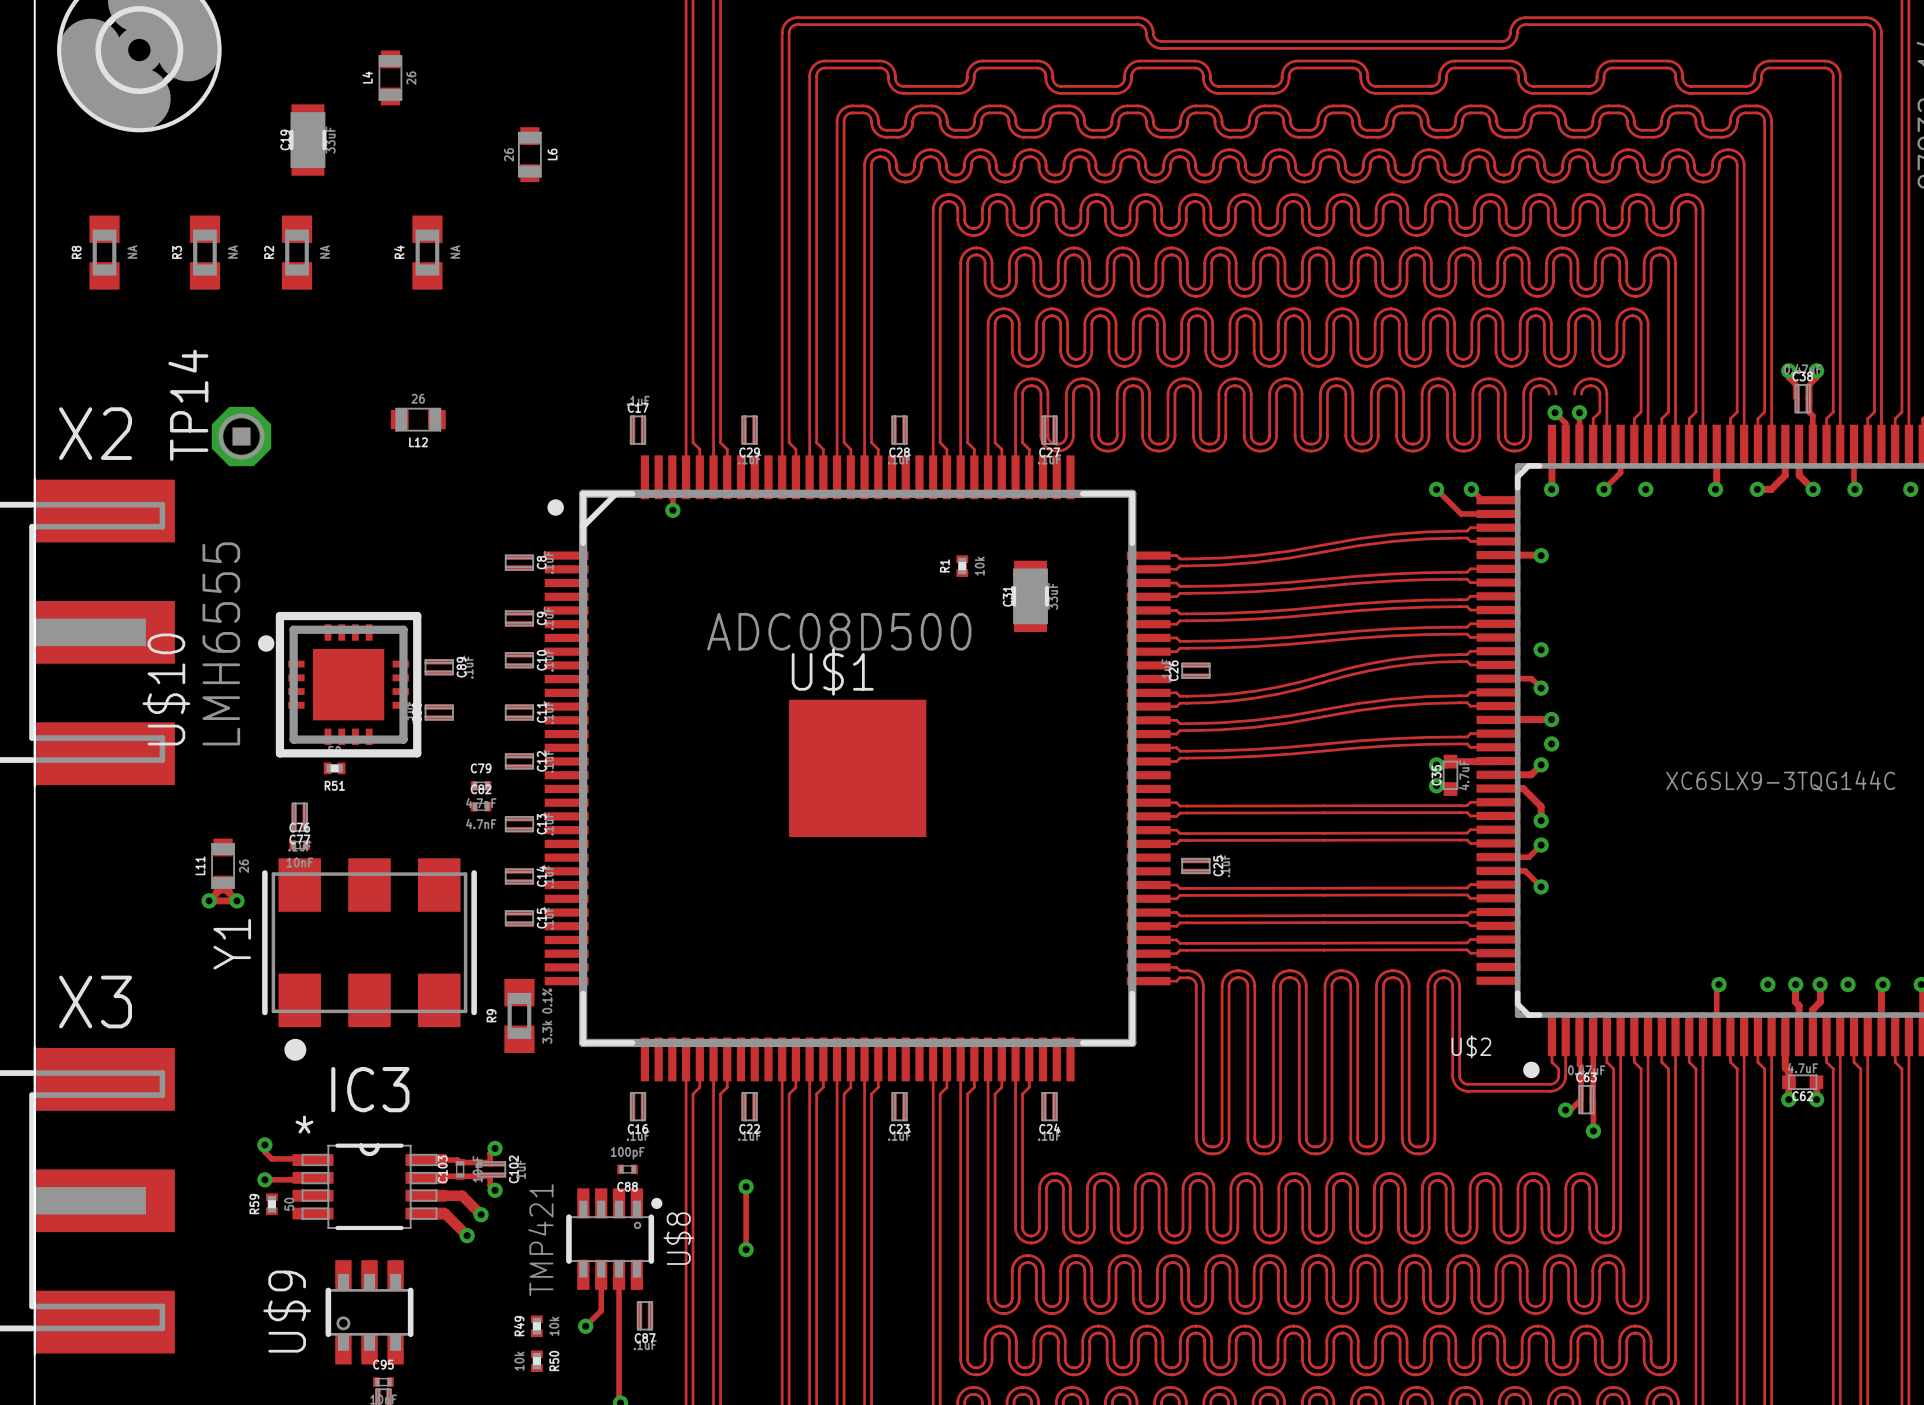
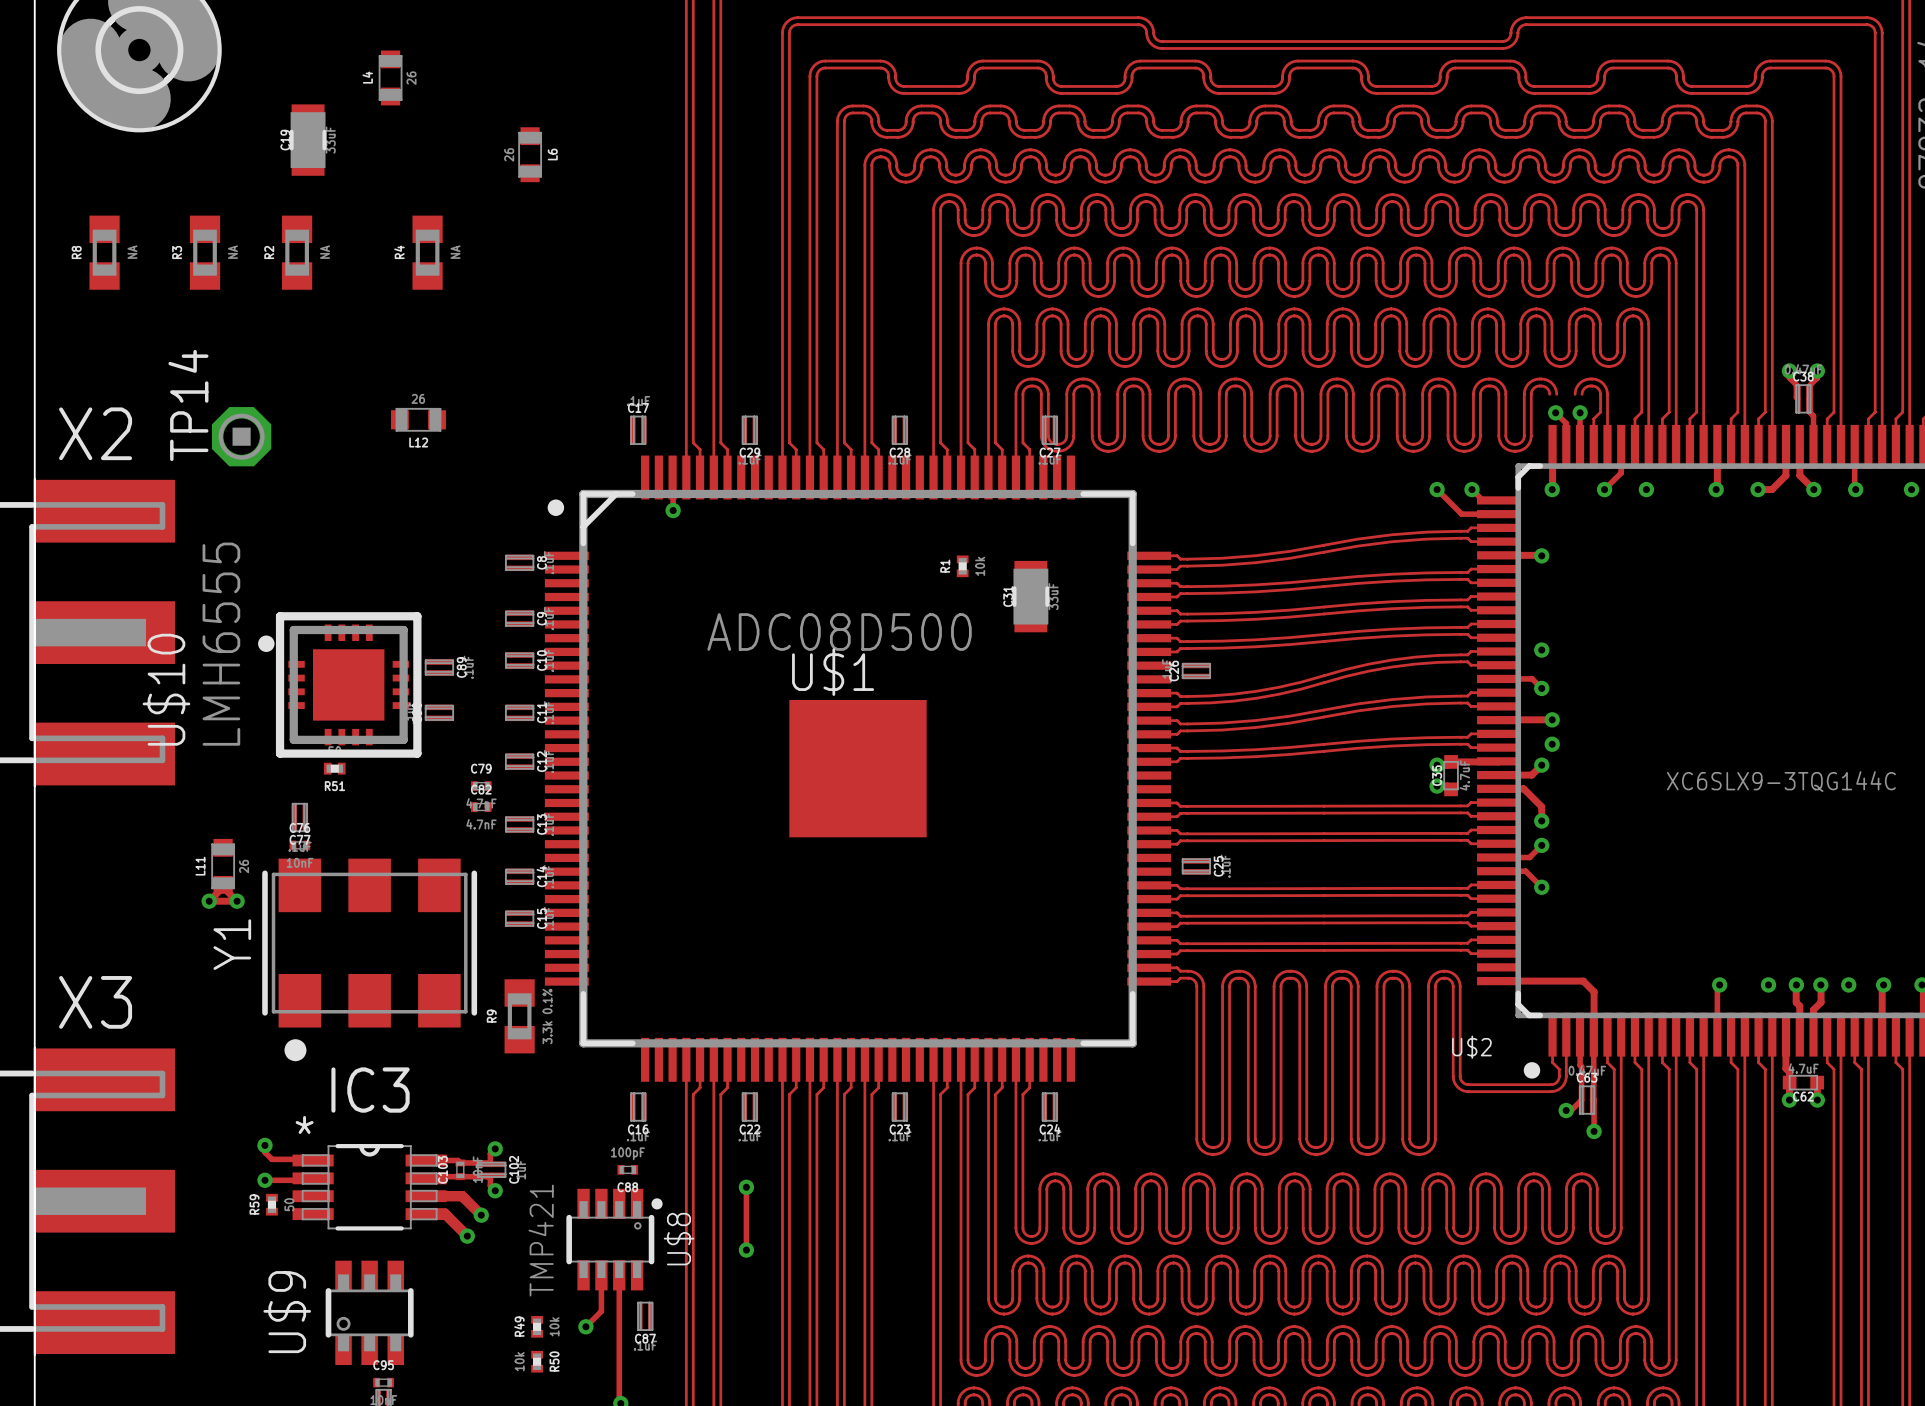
track: none -> (1499, 981) (1583, 981) (1594, 991) (1594, 1054)

